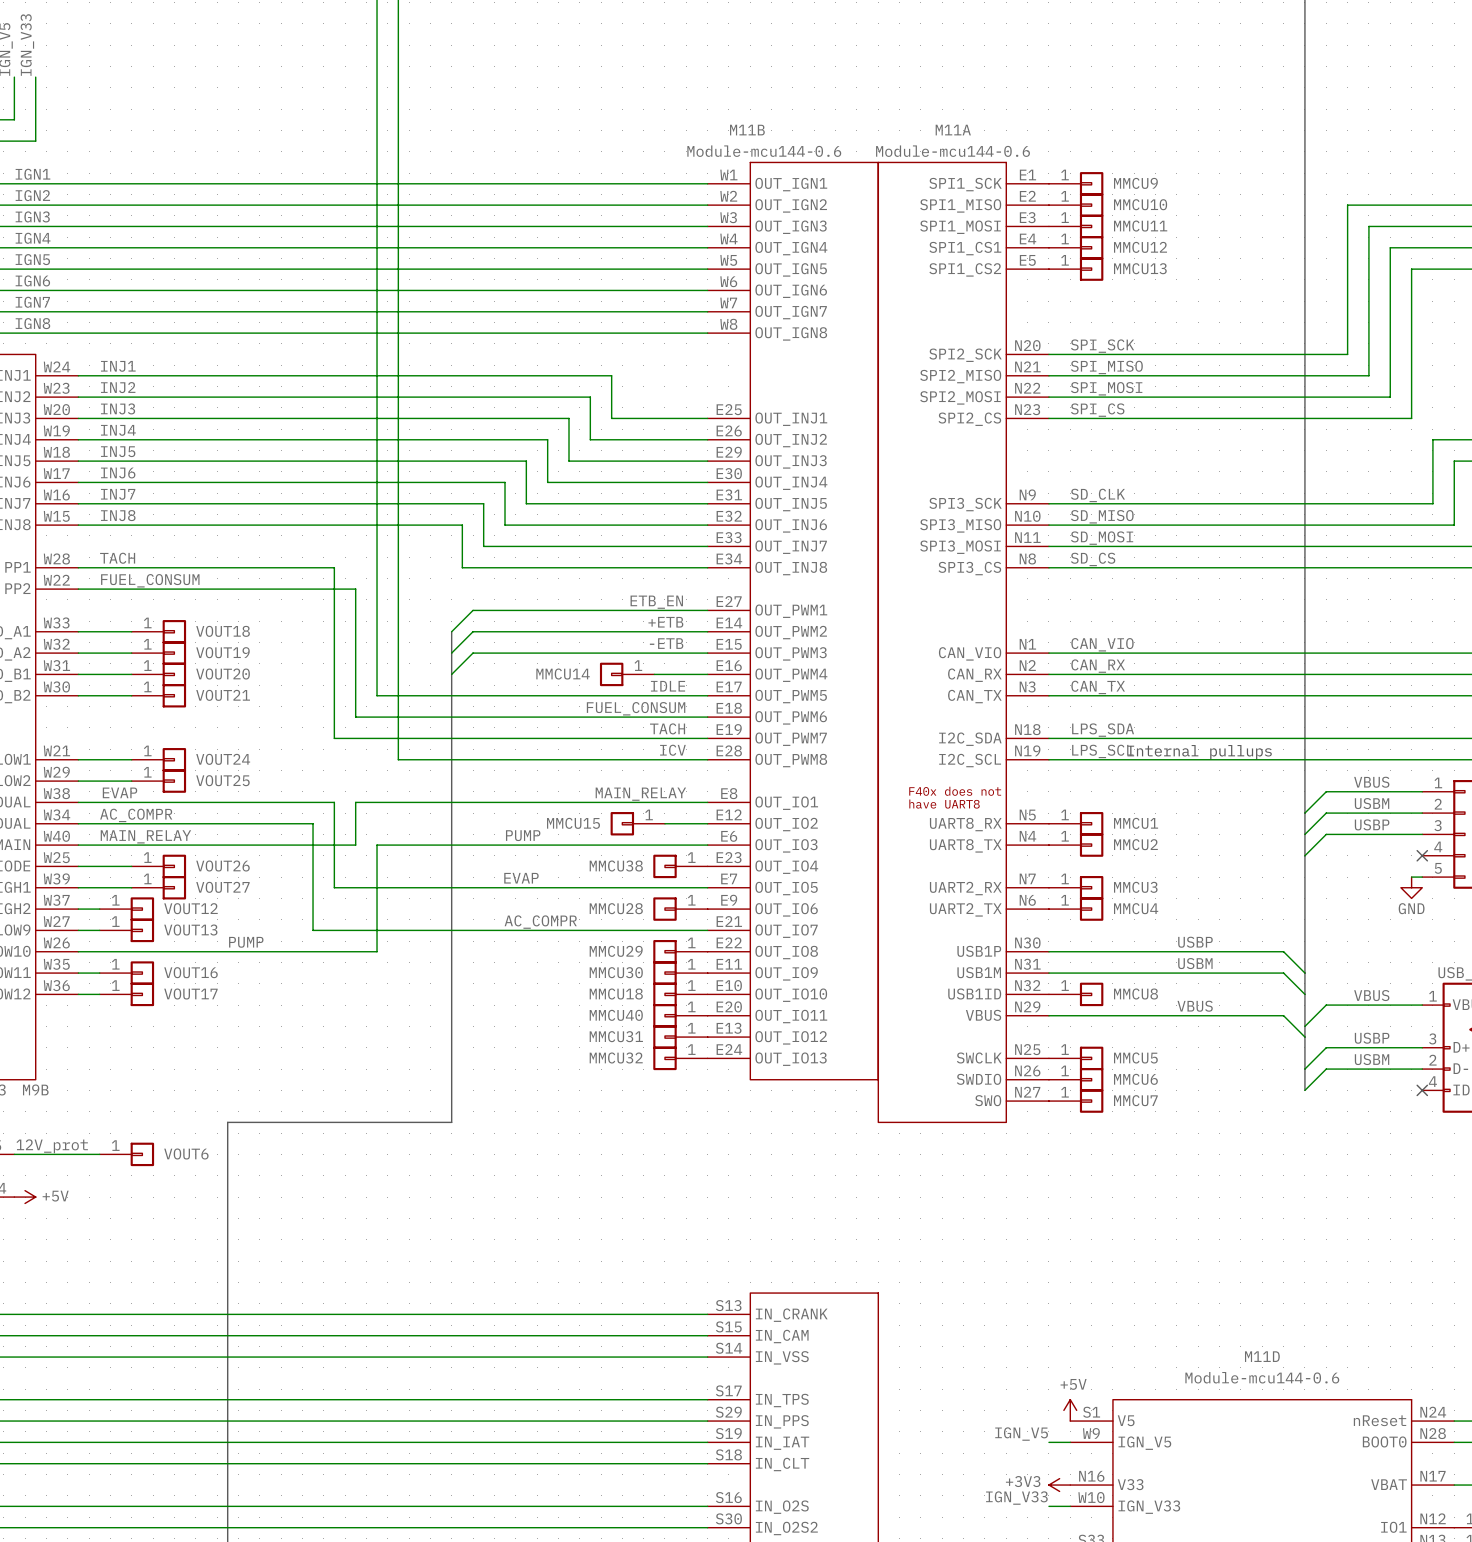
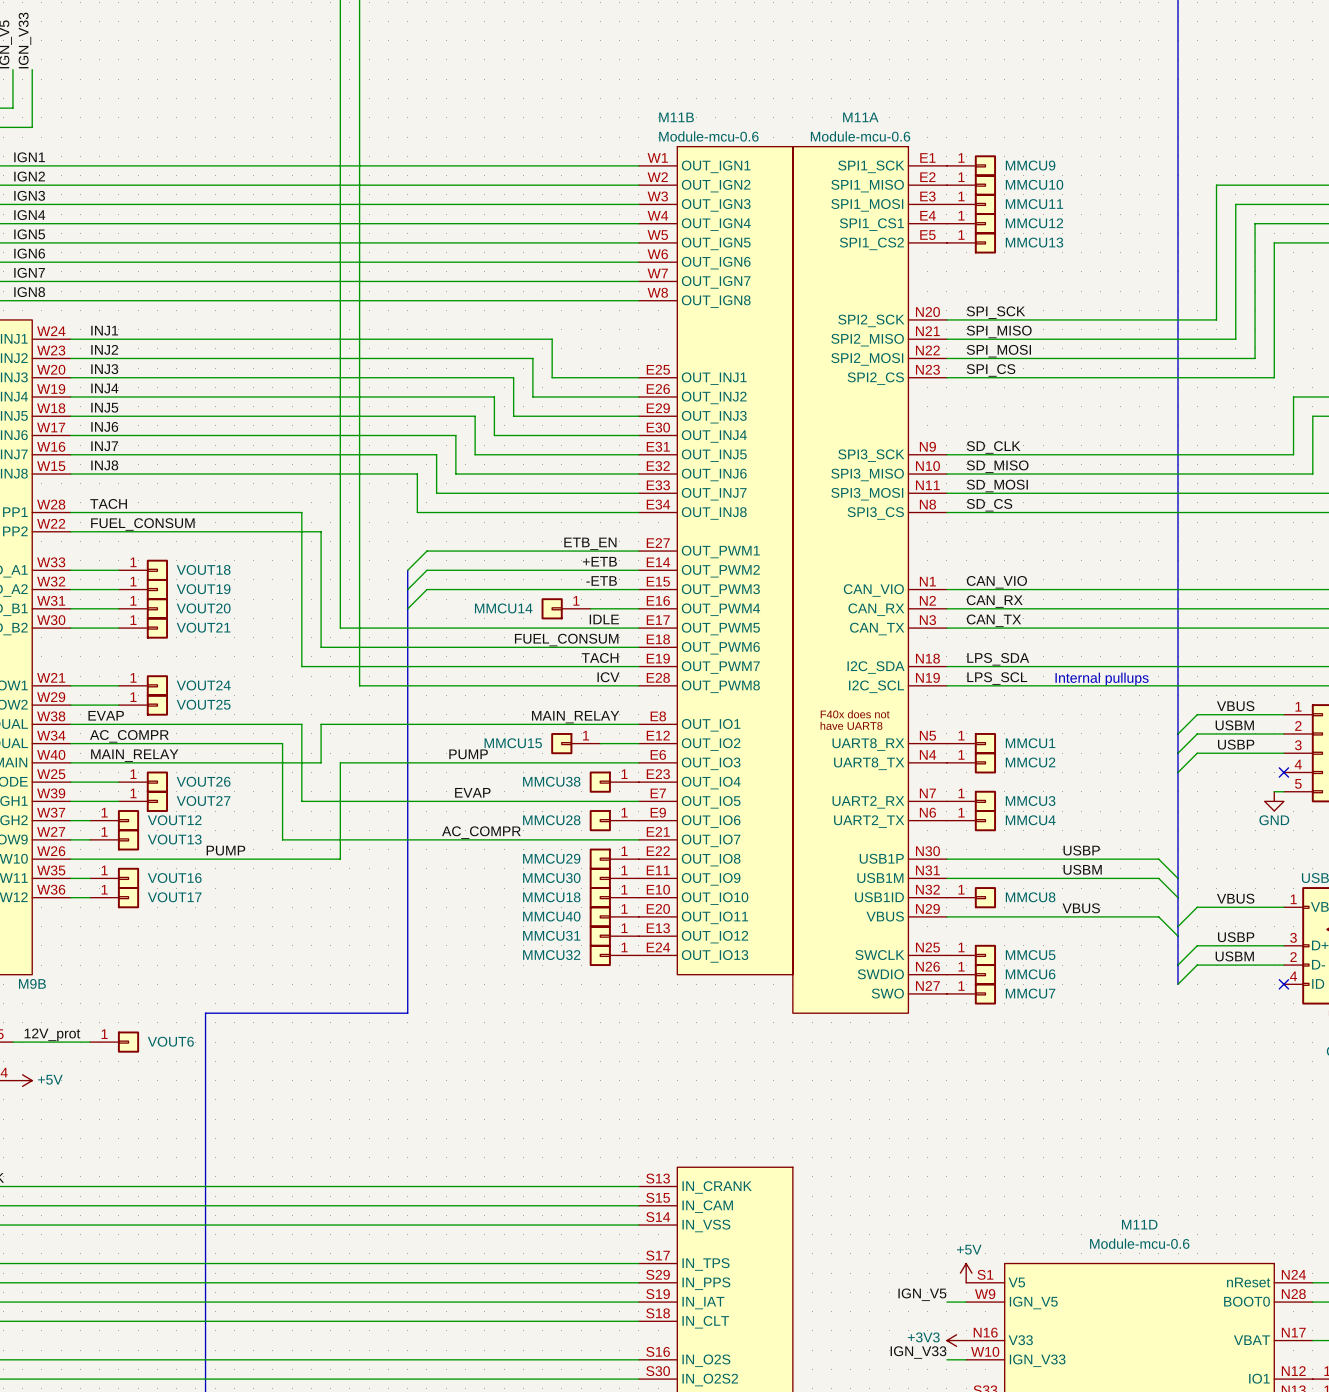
M11B value: Module-mcu144-0.6 (764, 151) -> Module-mcu-0.6 (708, 136)
M11A value: Module-mcu144-0.6 (953, 151) -> Module-mcu-0.6 (860, 136)
M11D value: Module-mcu144-0.6 (1262, 1377) -> Module-mcu-0.6 (1139, 1243)

